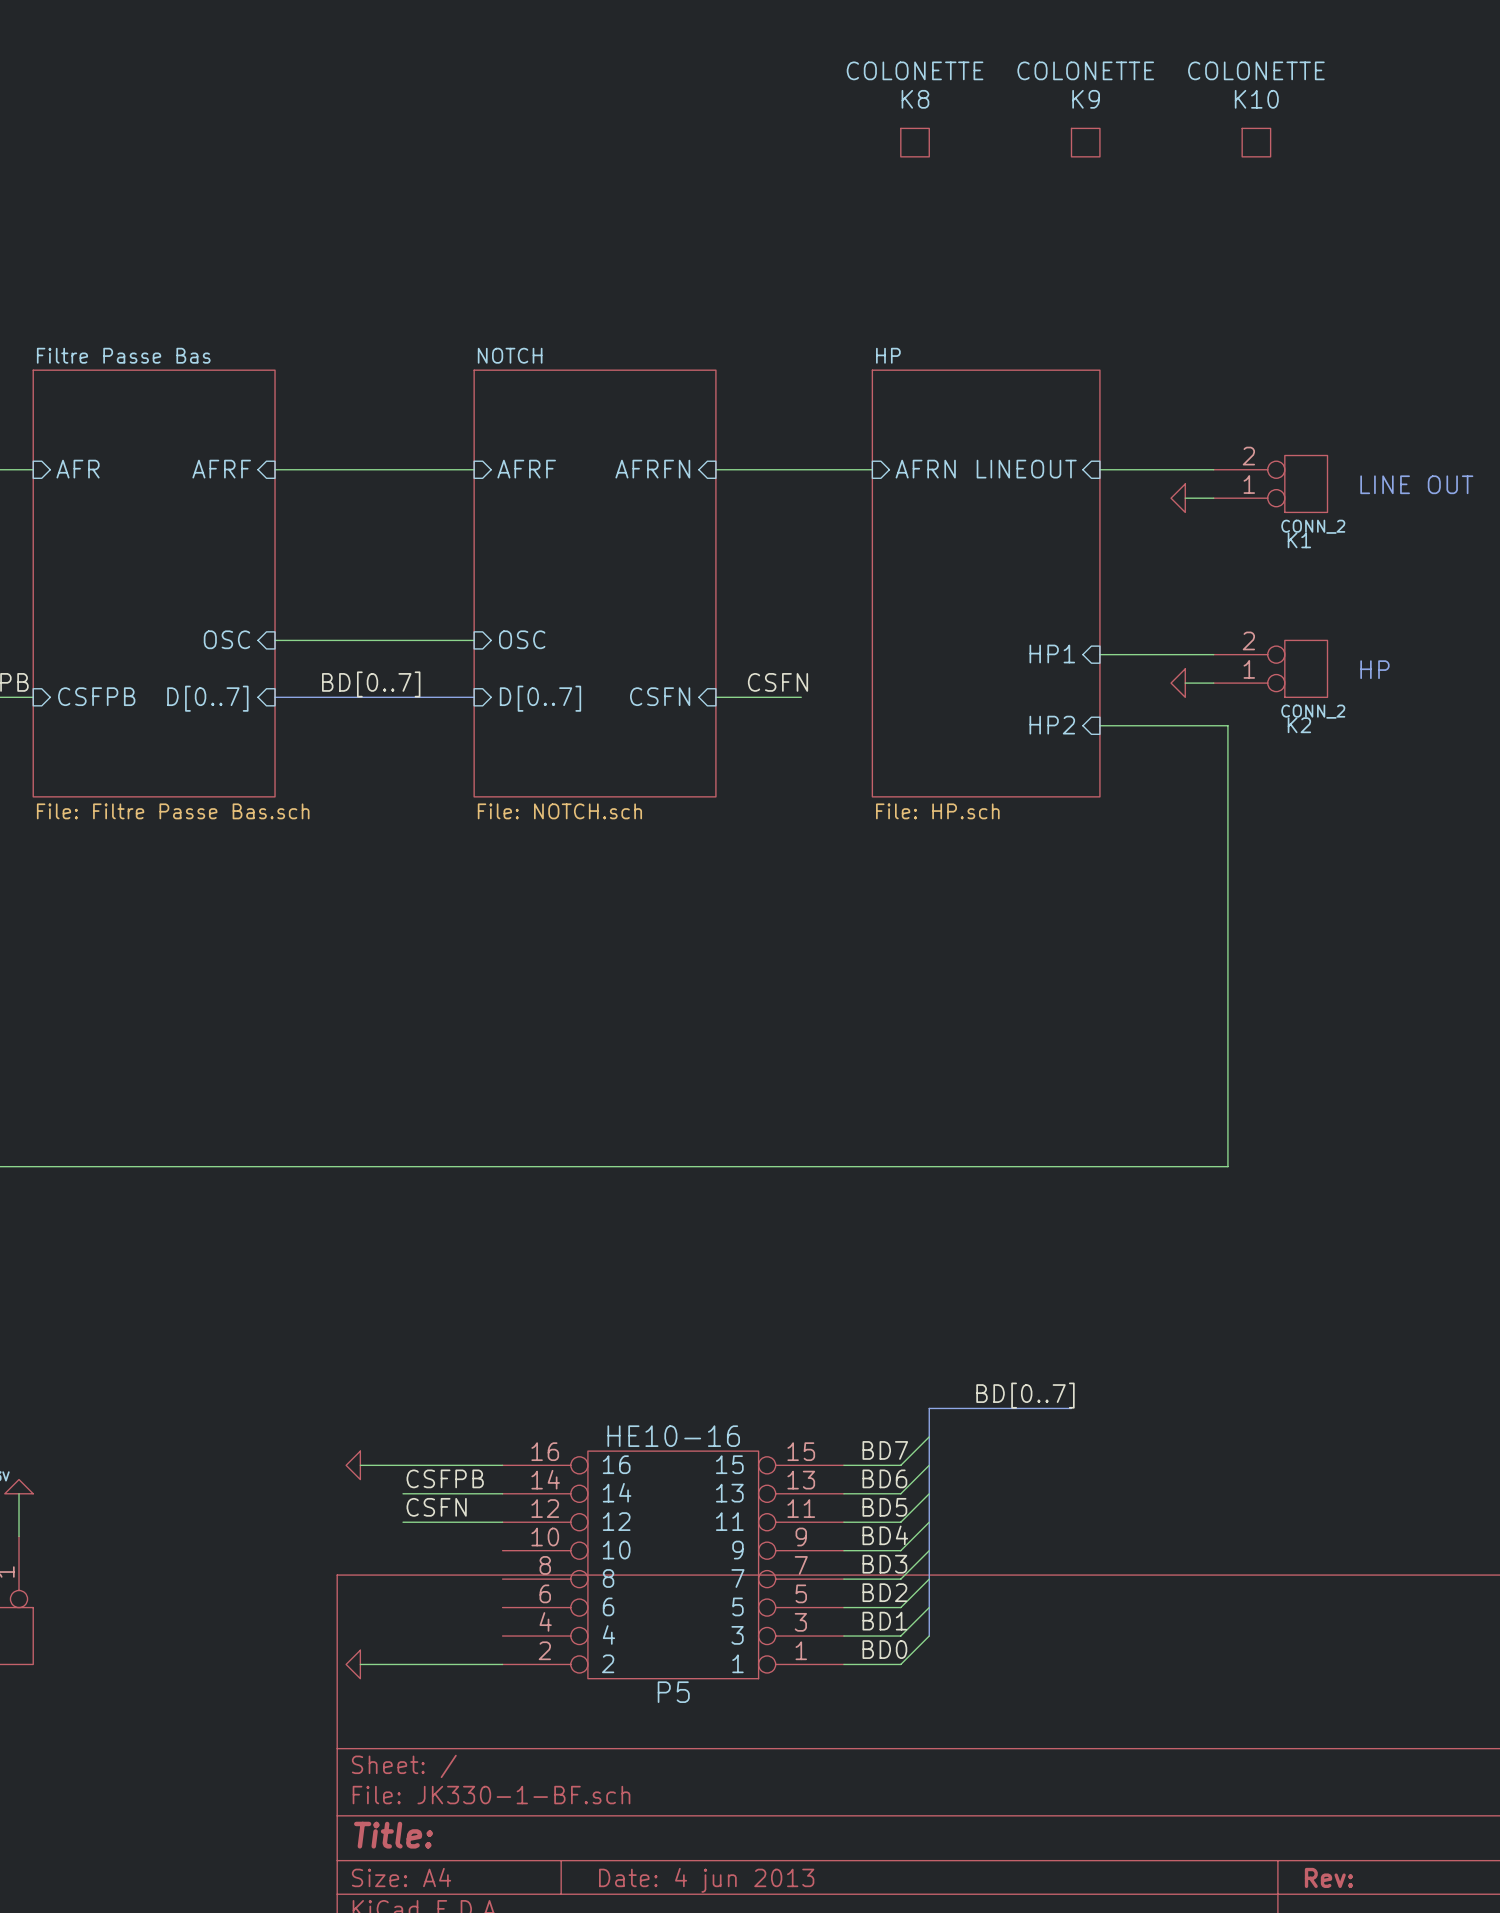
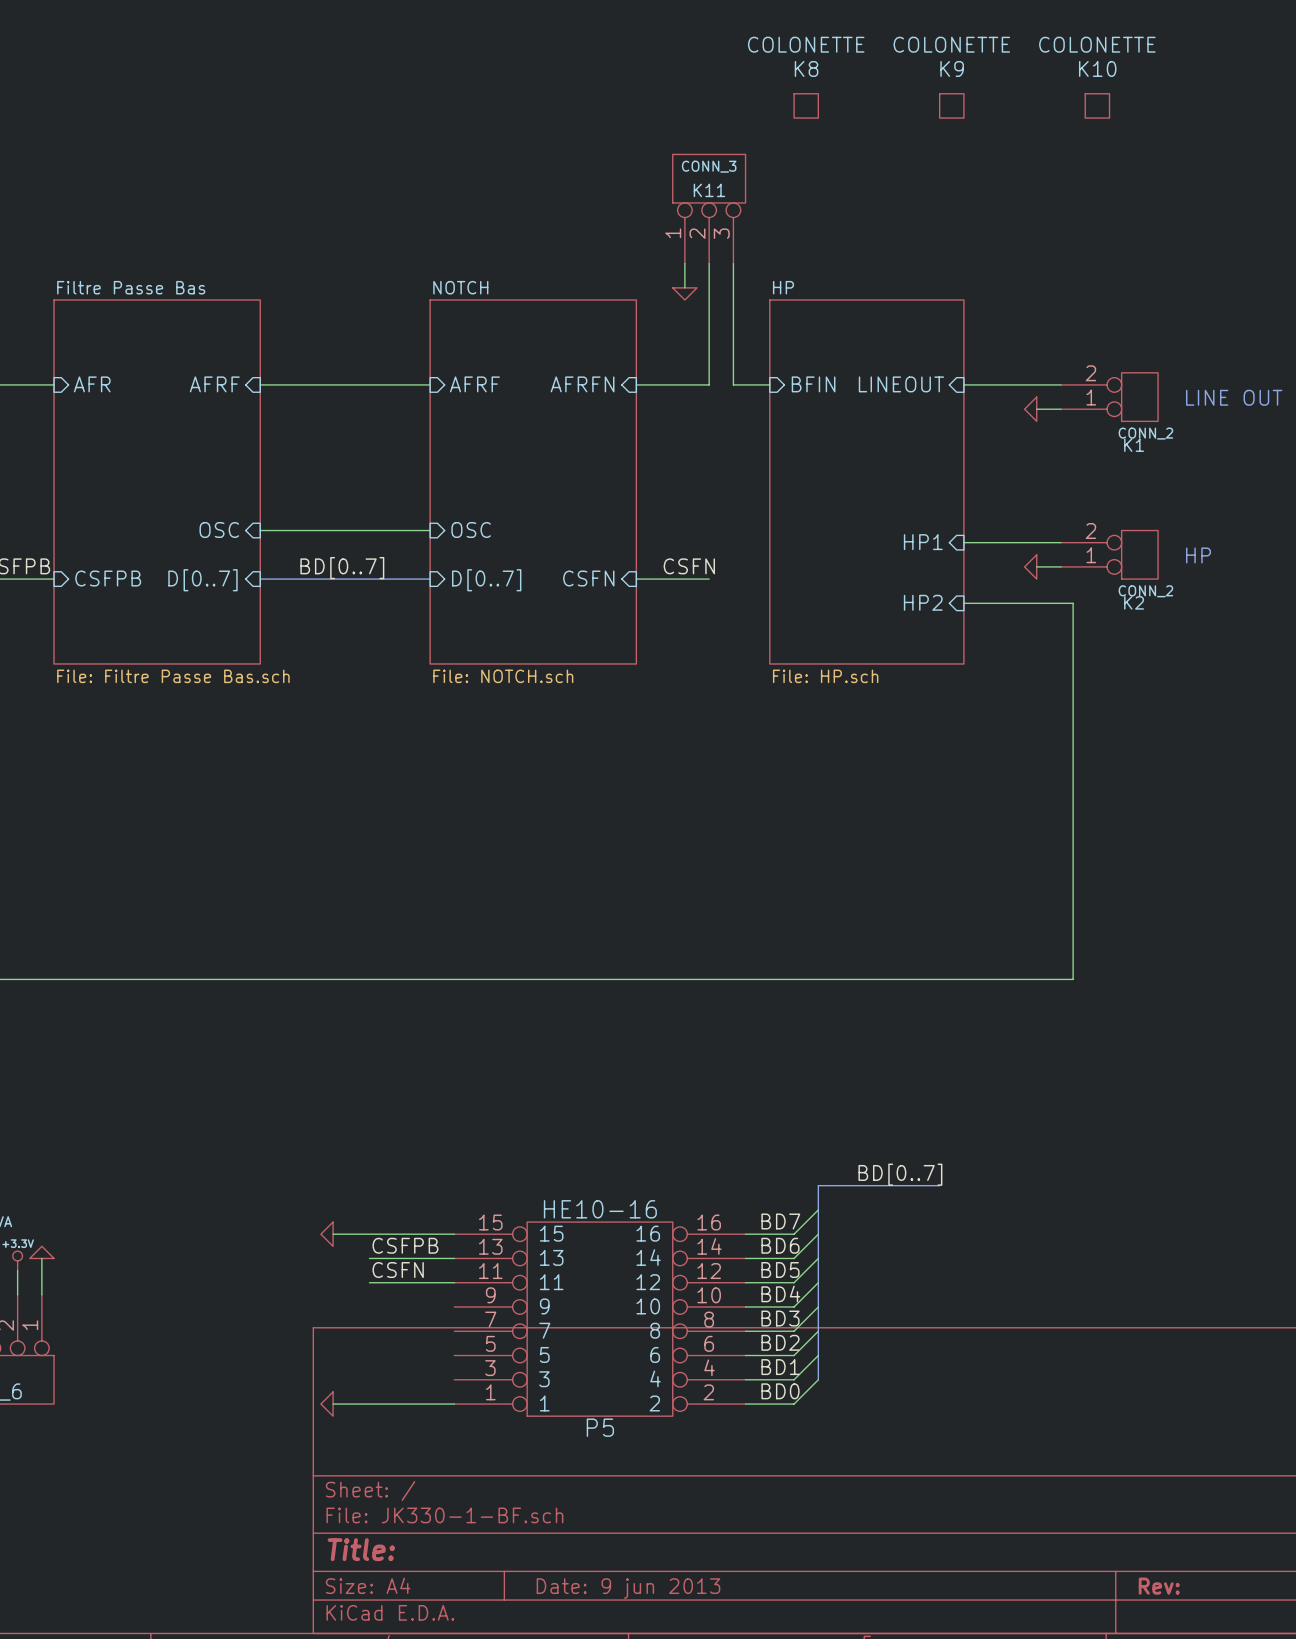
K11: none -> CONN_3 (709, 209)
wire: none -> (684, 263) (684, 287)
wire: none -> (733, 263) (733, 384)
power symbol: none -> (684, 293)
wire: (801, 469) (829, 469) -> (709, 384) (709, 263)
sheet pin: AFRN (925, 469) -> BFIN (813, 384)
P5 flip: as is (673, 1564) -> left-right (599, 1319)
title block: Date: 4 jun 2013 (706, 1880) -> Date: 9 jun 2013 (628, 1588)

